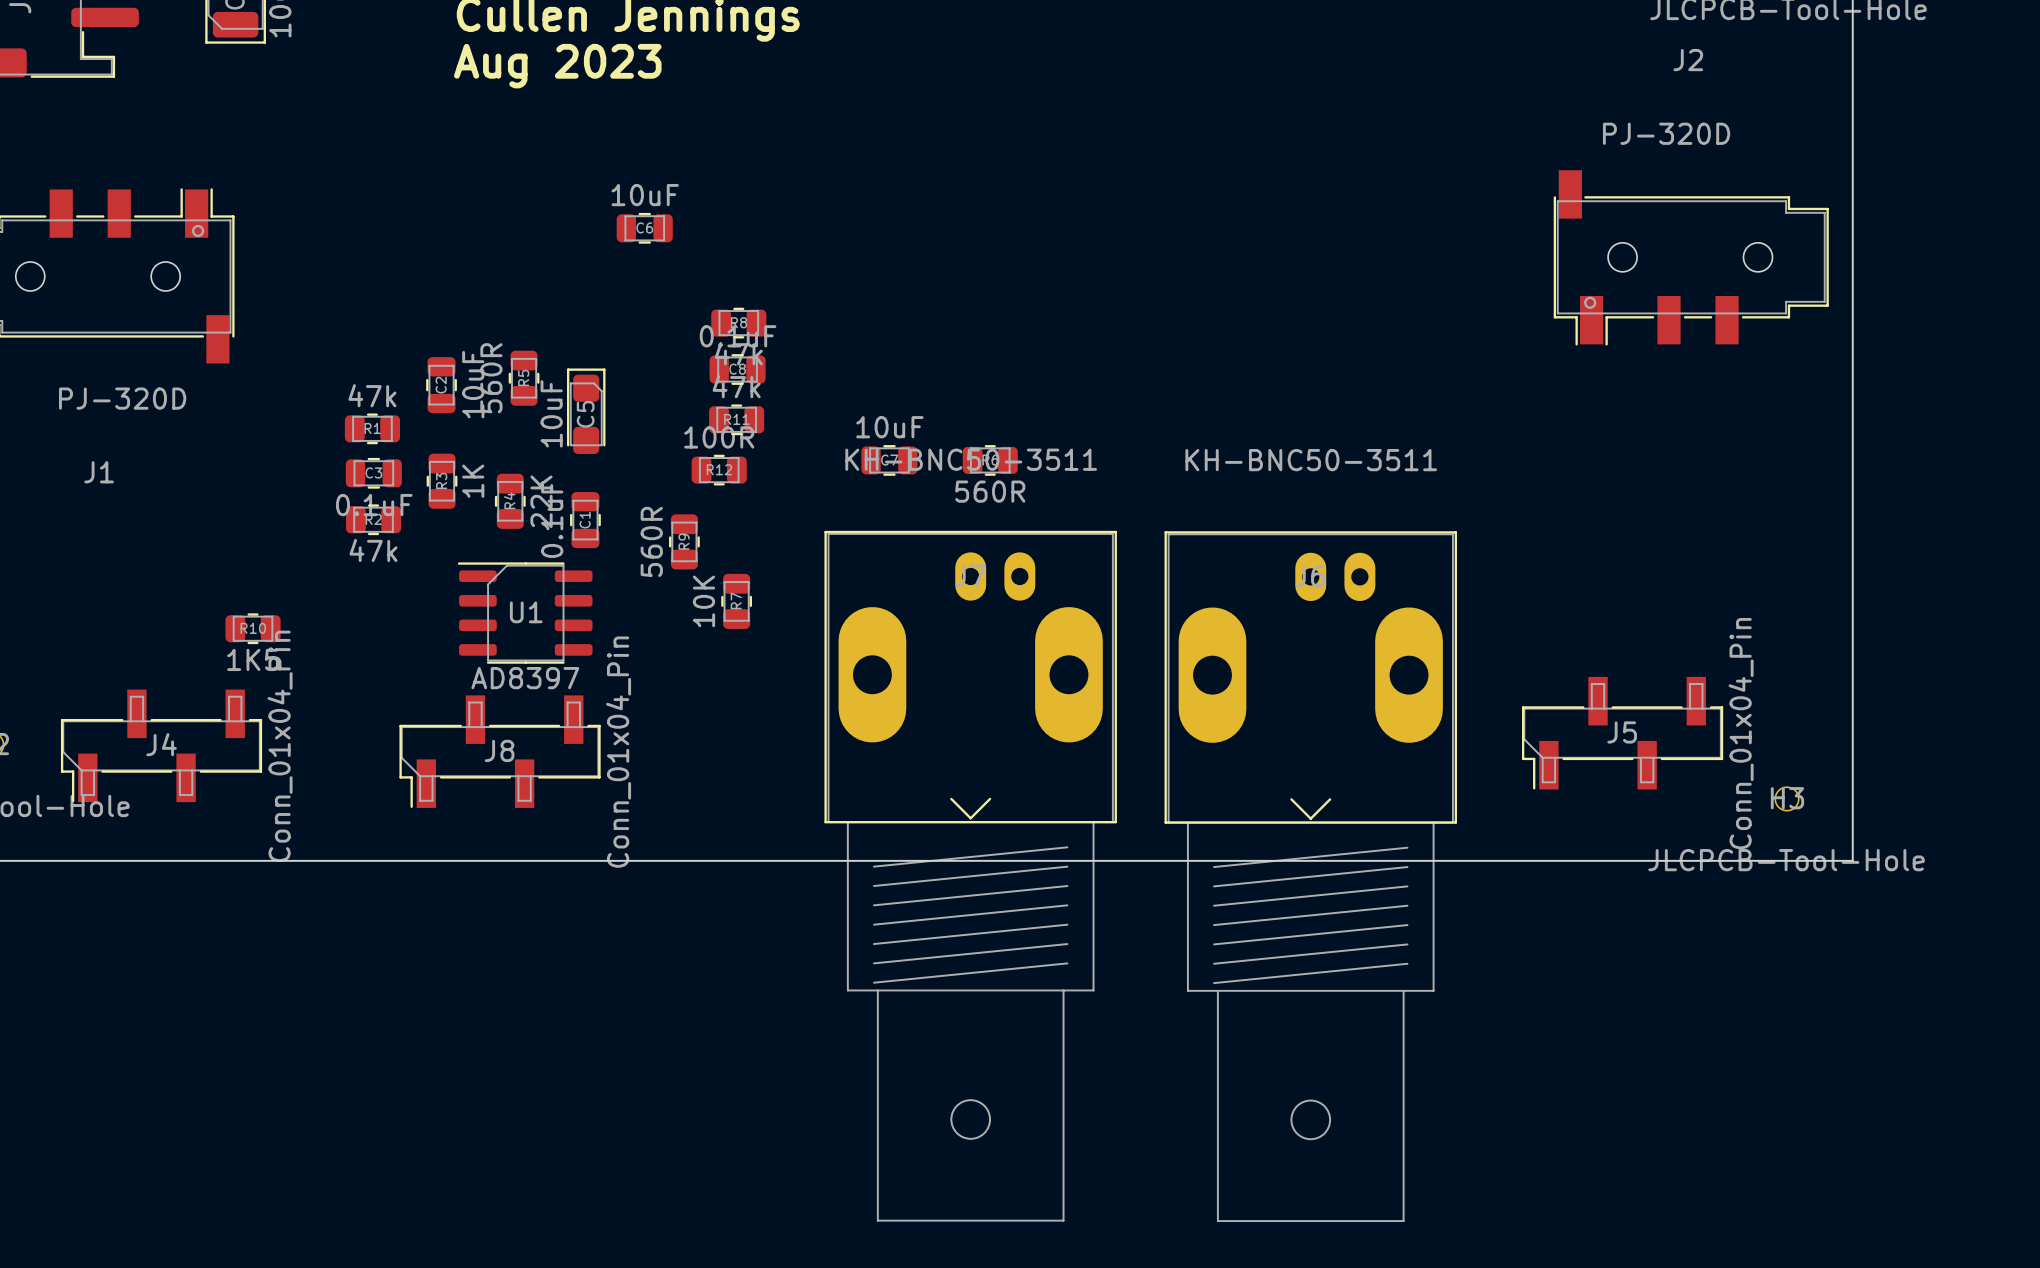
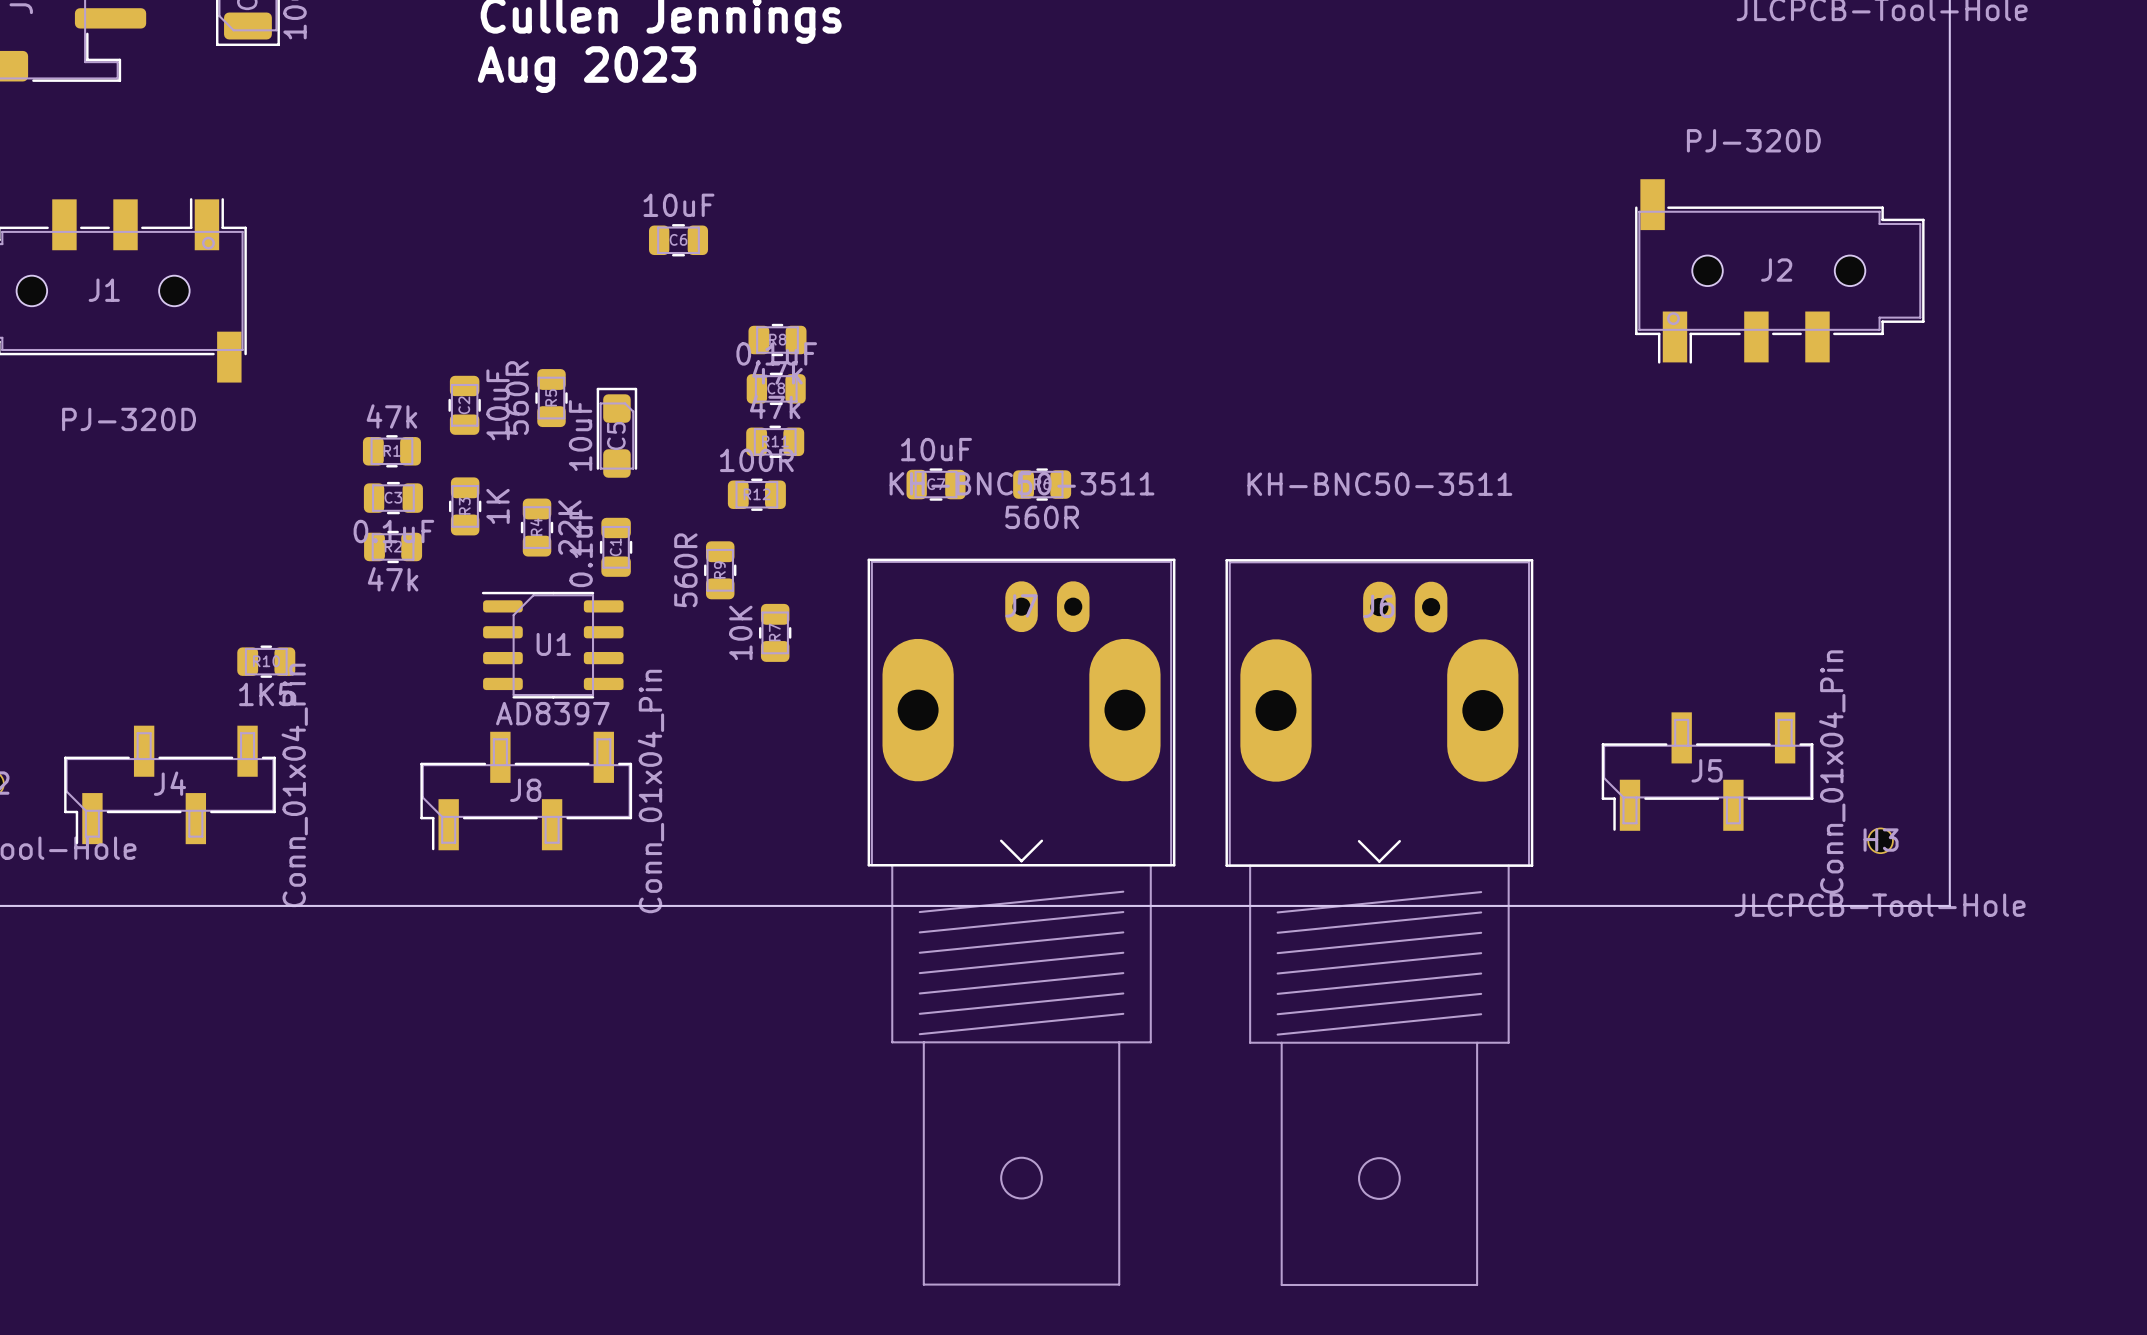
J2 name position: J2 (1688, 60) -> J2 (1776, 270)
J1 name position: J1 (99, 472) -> J1 (104, 290)

